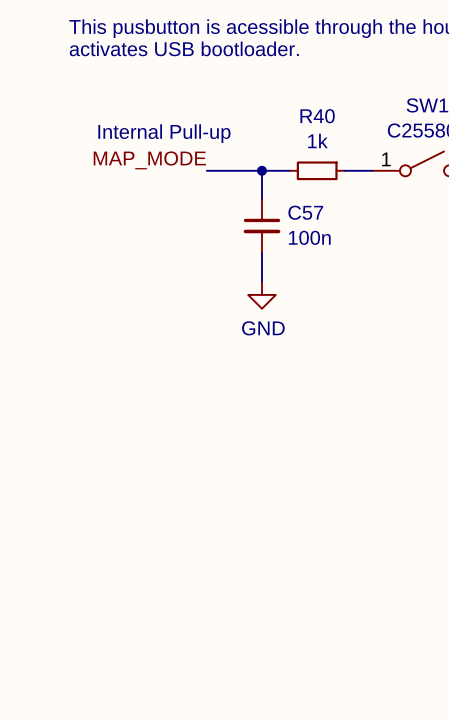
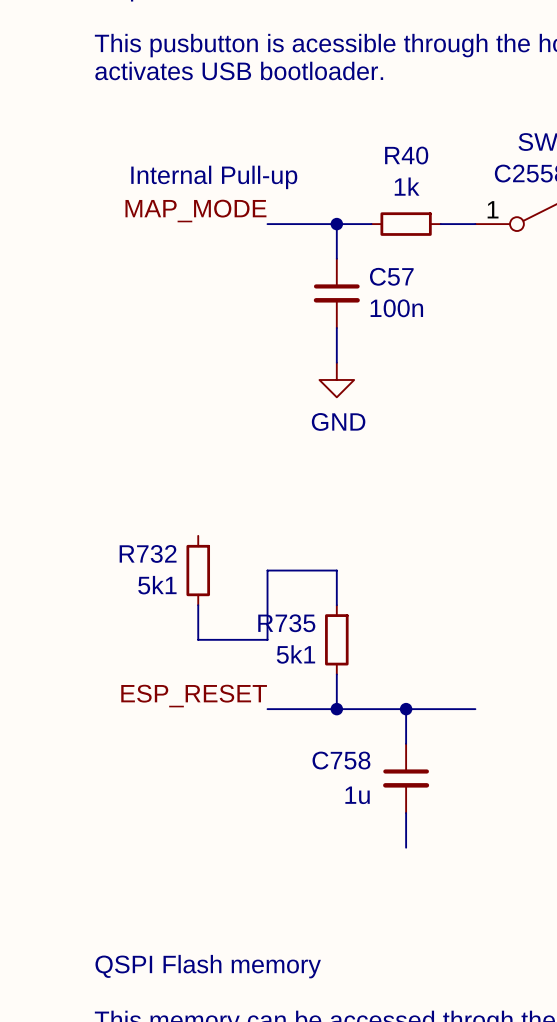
R732: none -> 5k1 (198, 570)
wire: none -> (198, 605) (198, 639) (267, 639) (267, 570) (336, 570) (336, 605)
R735: none -> 5k1 (336, 639)
wire: none -> (336, 674) (336, 709)
label: none -> ESP_RESET (194, 696)
wire: none -> (267, 709) (475, 709)
junction: none -> (336, 709)
wire: none -> (406, 709) (406, 743)
junction: none -> (406, 709)
C758: none -> 1u (406, 778)
wire: none -> (406, 813) (406, 847)

